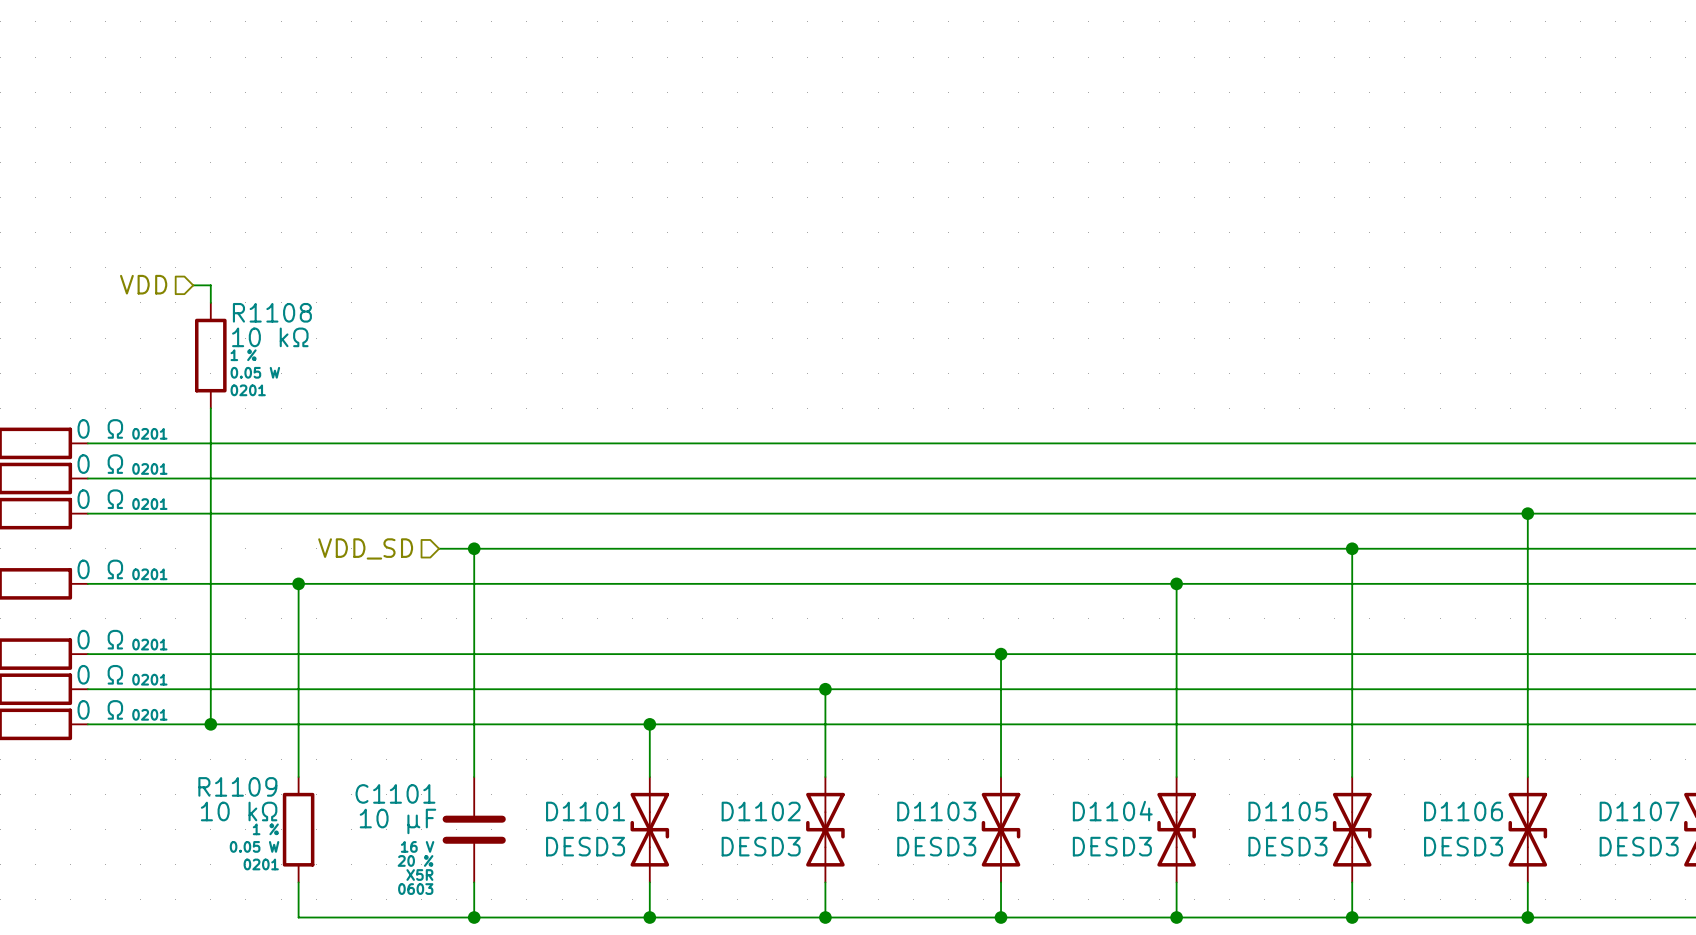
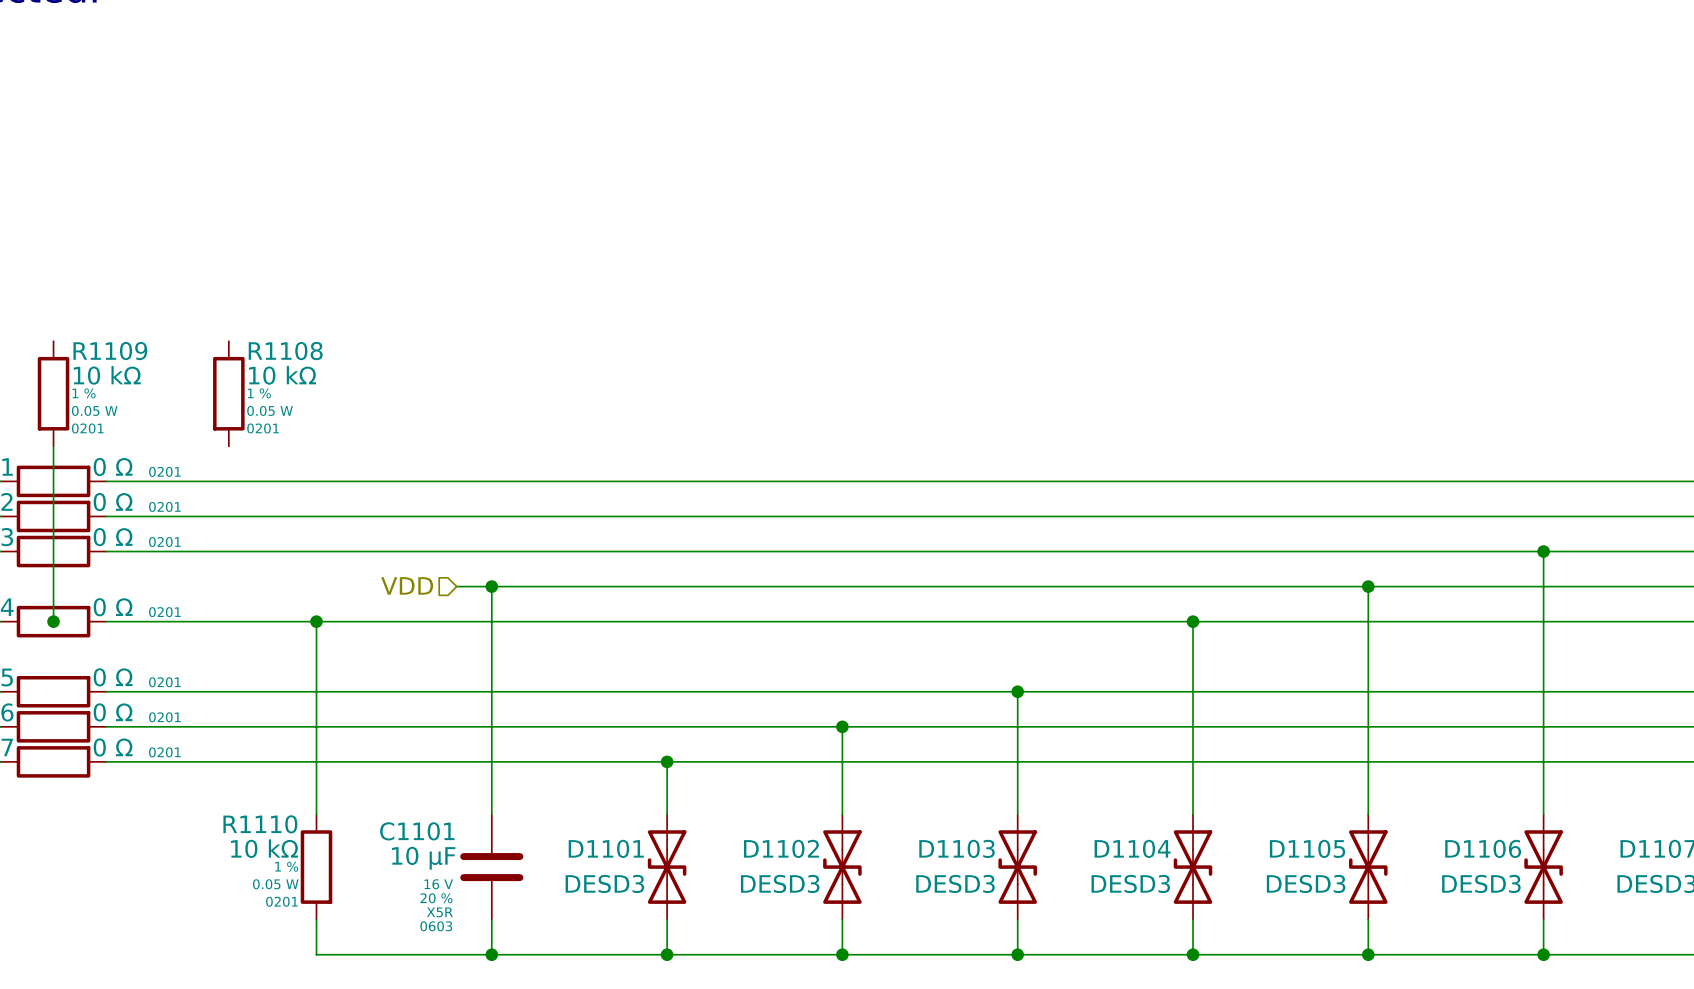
hierarchical label: VDD (143, 284) -> none
wire: (193, 285) (210, 285) (210, 302) -> none
R1109: none -> 10 kΩ (53, 393)
wire: none -> (53, 446) (53, 621)
wire: (210, 408) (210, 724) -> none
hierarchical label: VDD_SD (365, 548) -> VDD (407, 585)
junction: none -> (53, 621)
junction: (210, 724) -> none
R1109 name: R1109 (237, 786) -> R1110 (260, 824)

